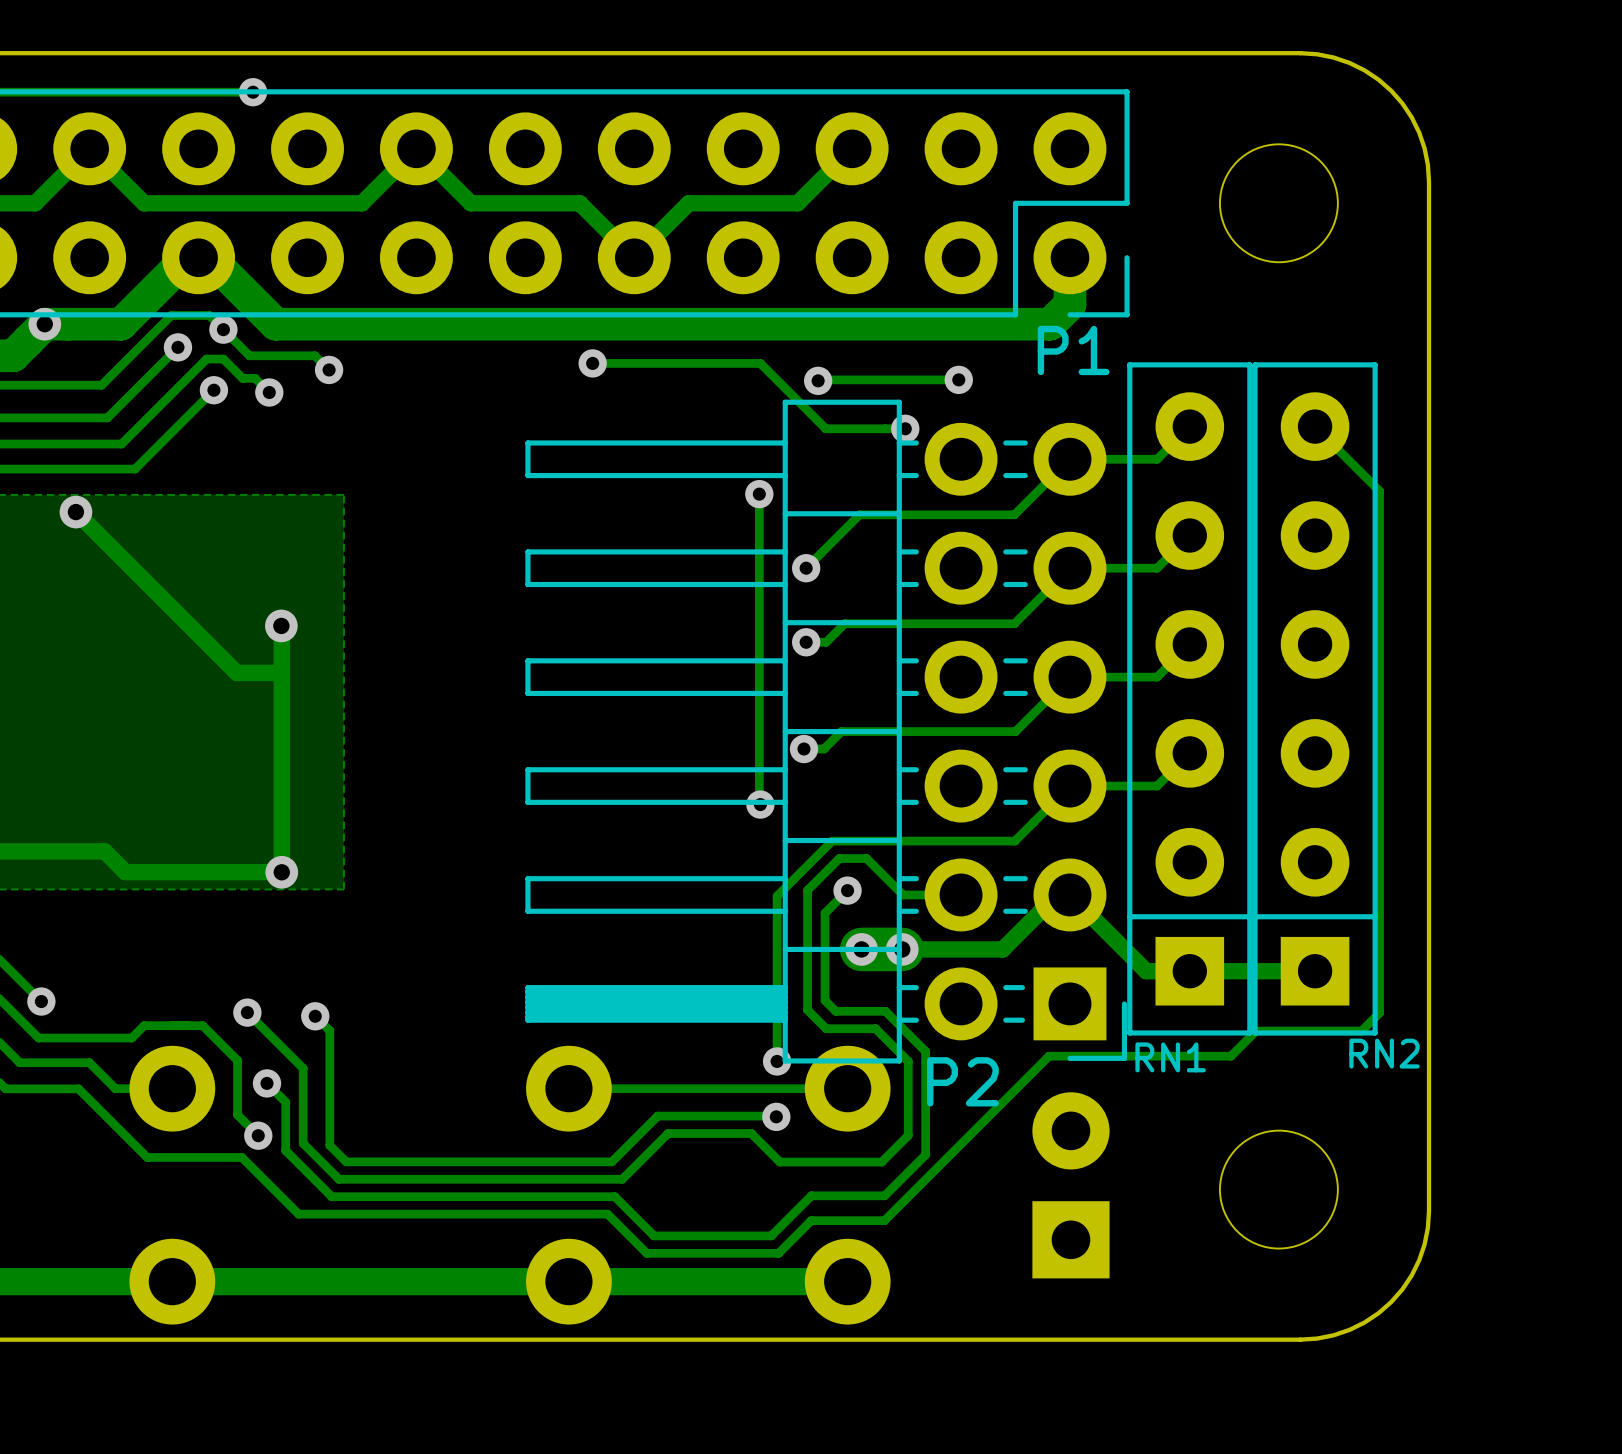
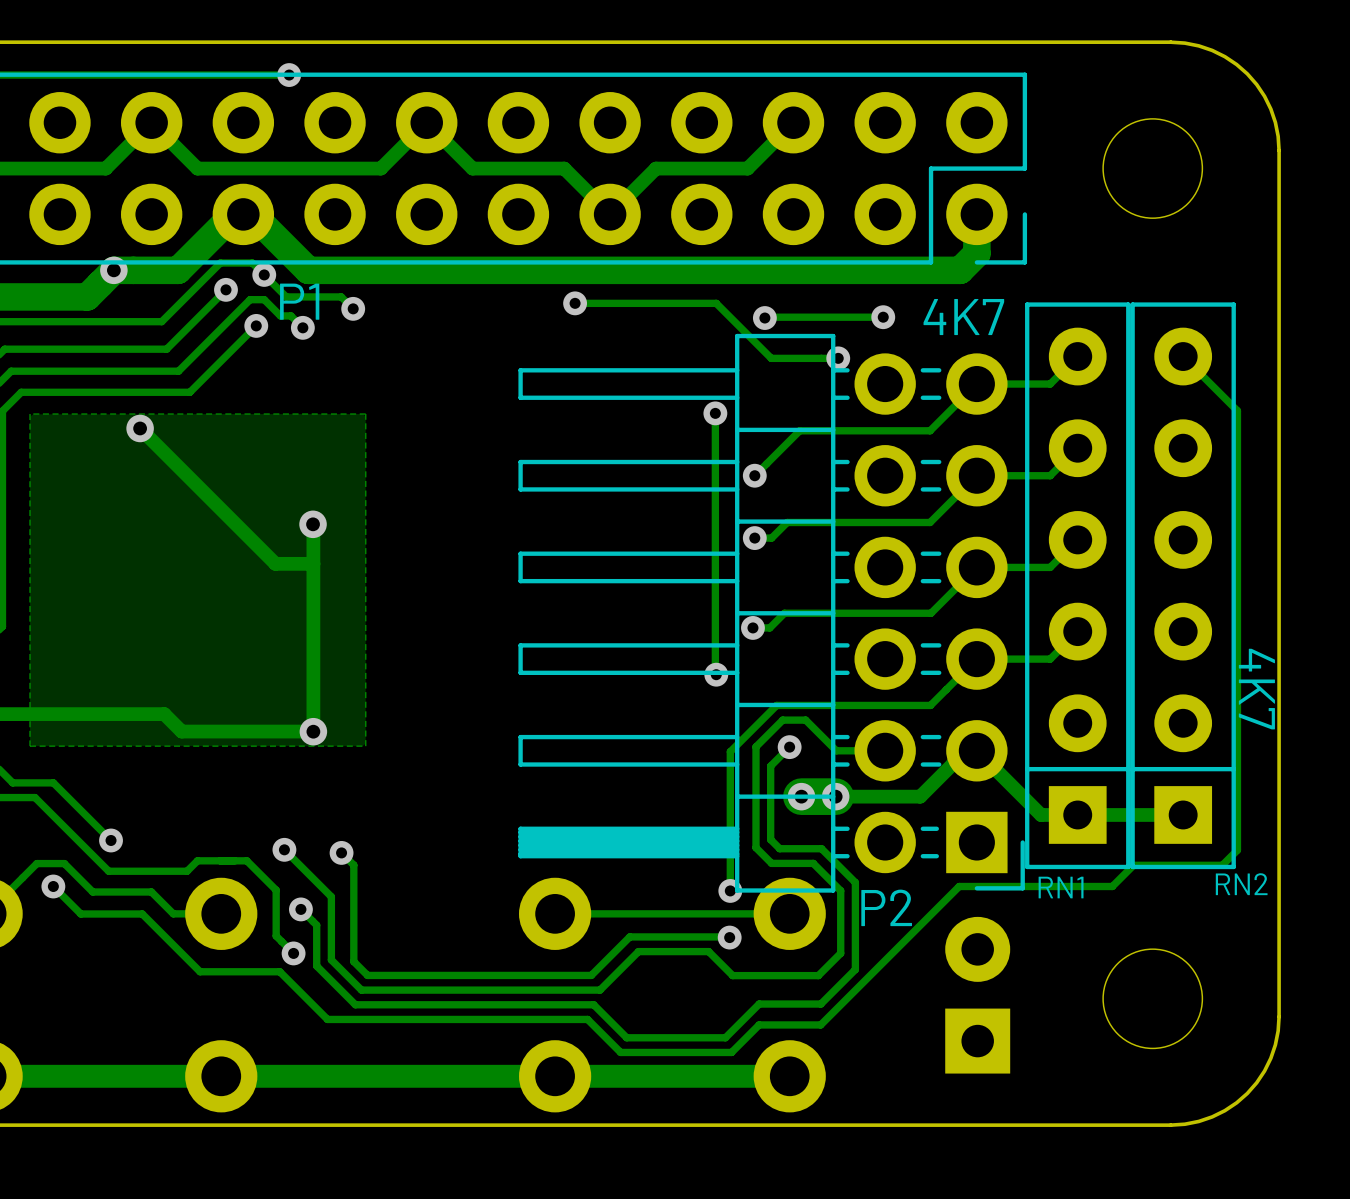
P1 name position: P1 (1073, 350) -> P1 (299, 301)
RN1 value: none -> 4K7 (963, 317)
RN2 value: none -> 4K7 (1256, 689)

